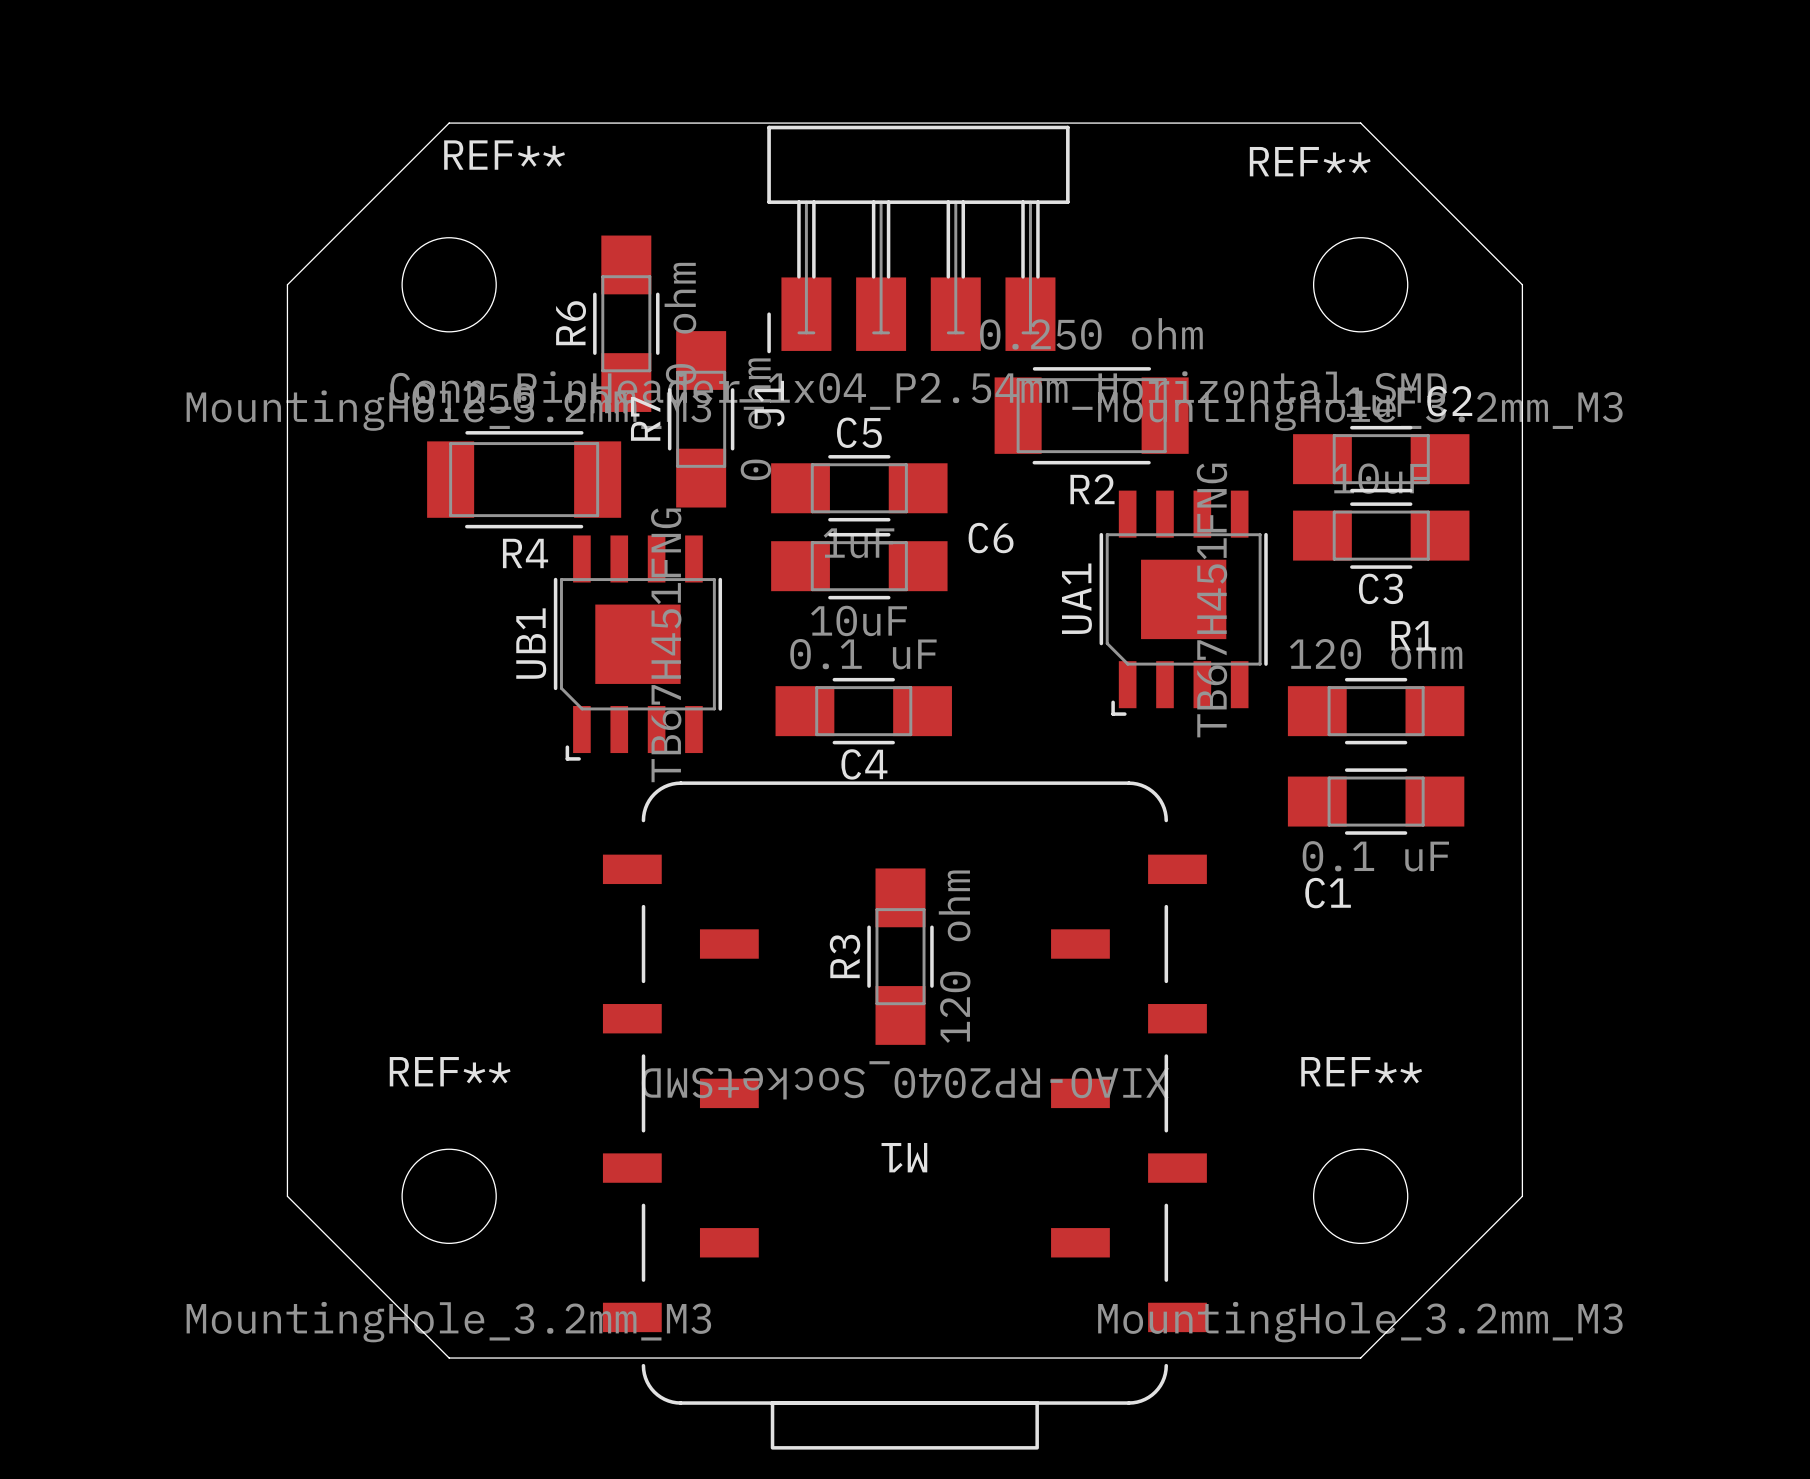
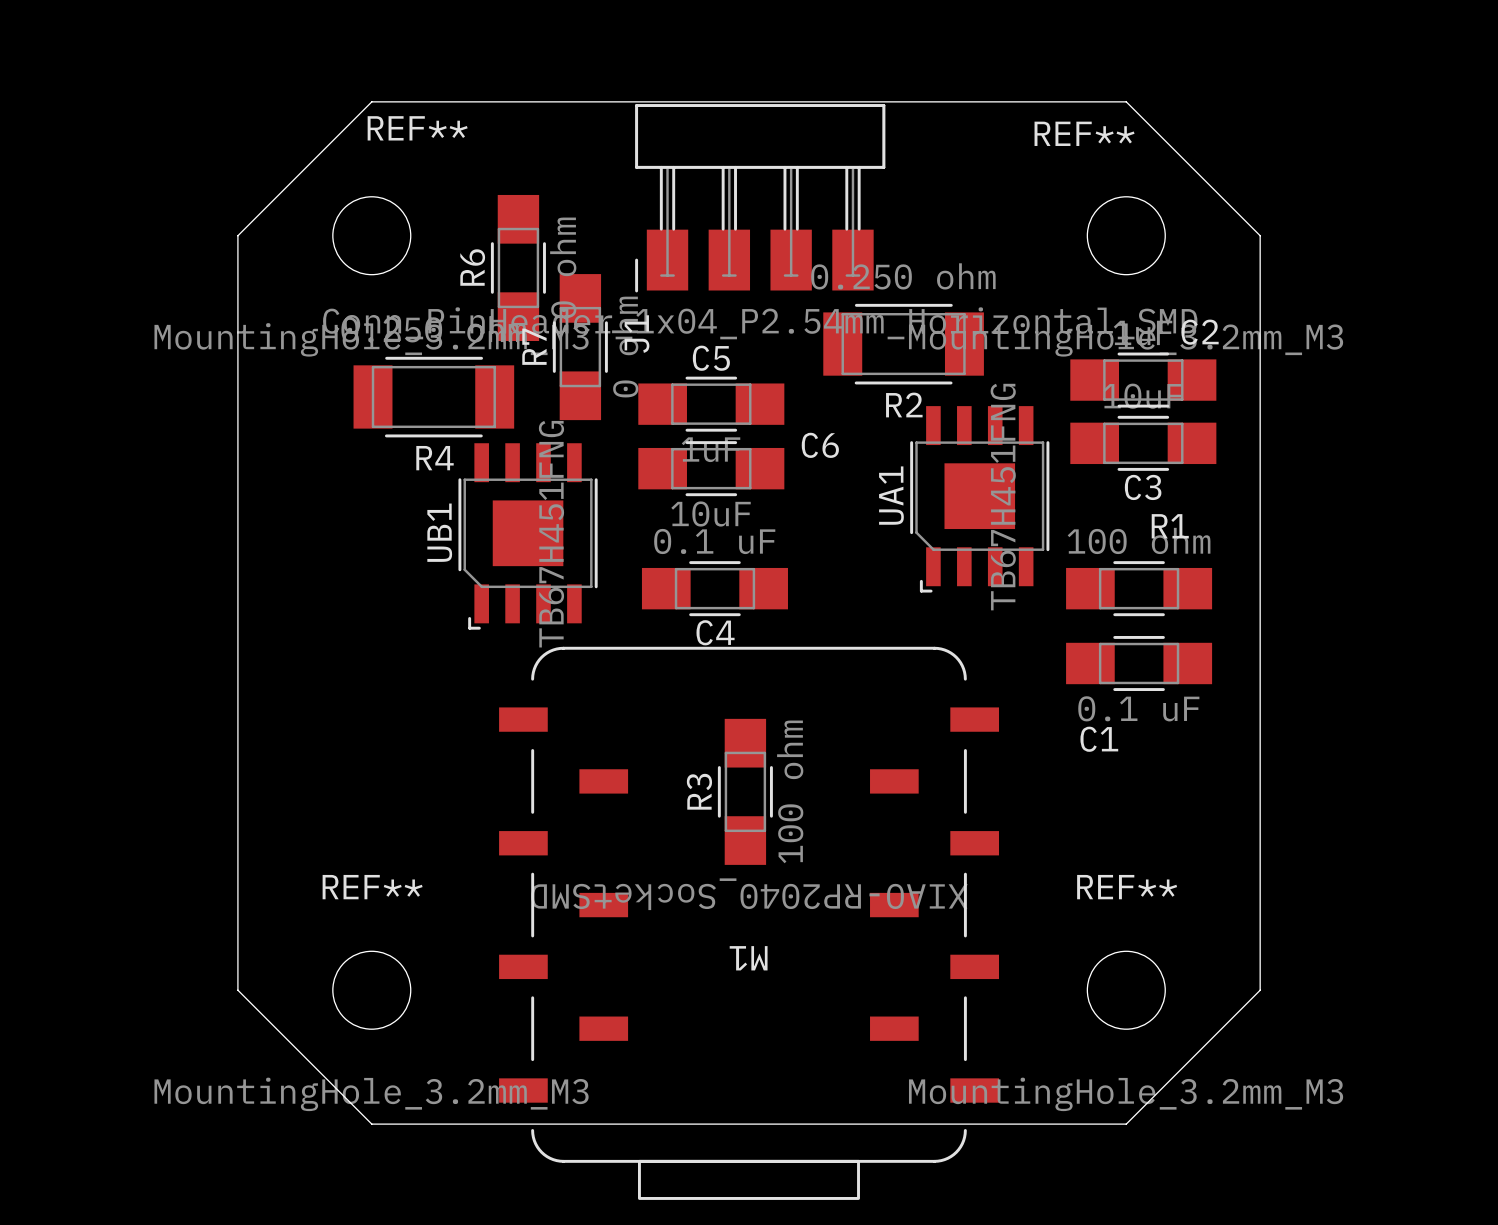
R1 value: 120 ohm (1376, 653) -> 100 ohm (1139, 540)
R3 value: 120 ohm (954, 956) -> 100 ohm (790, 791)

